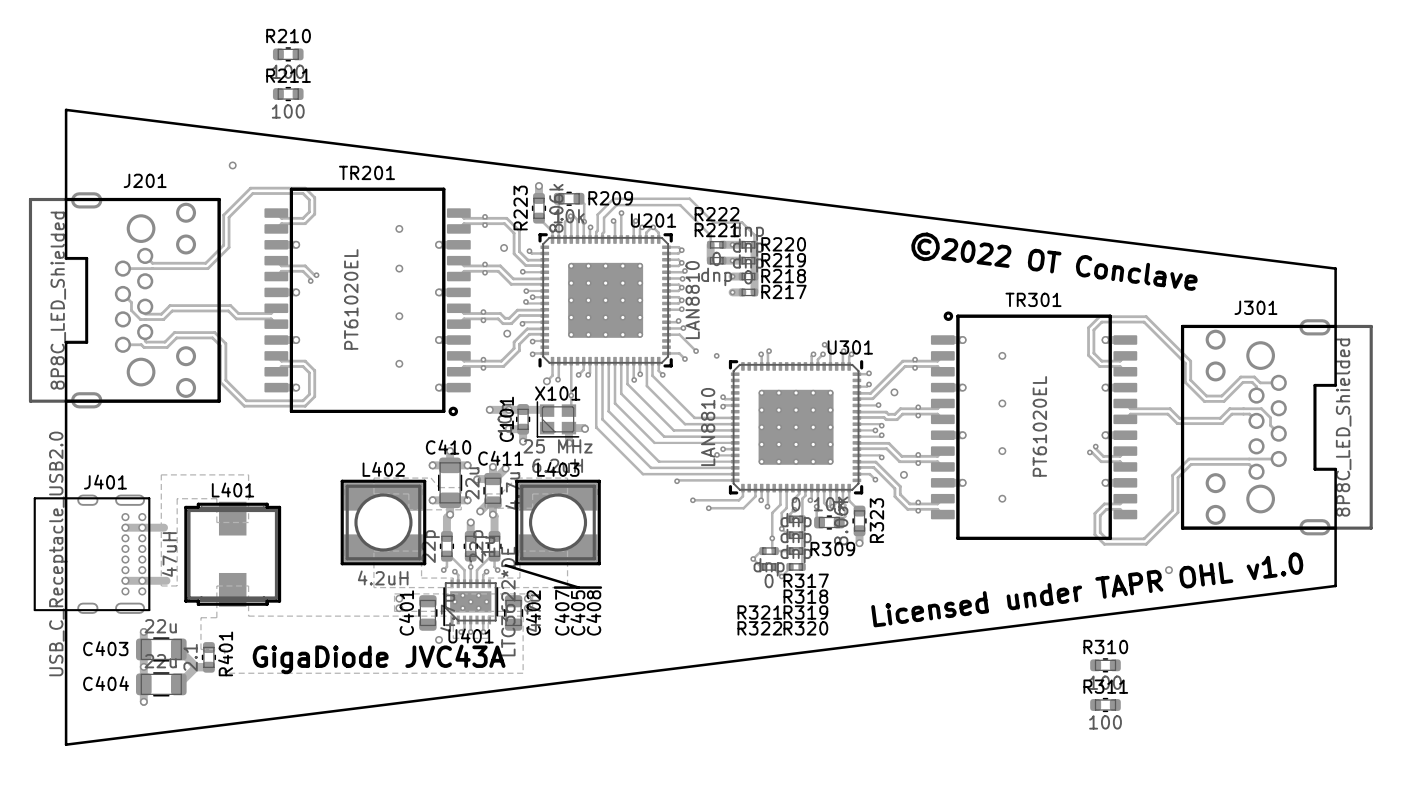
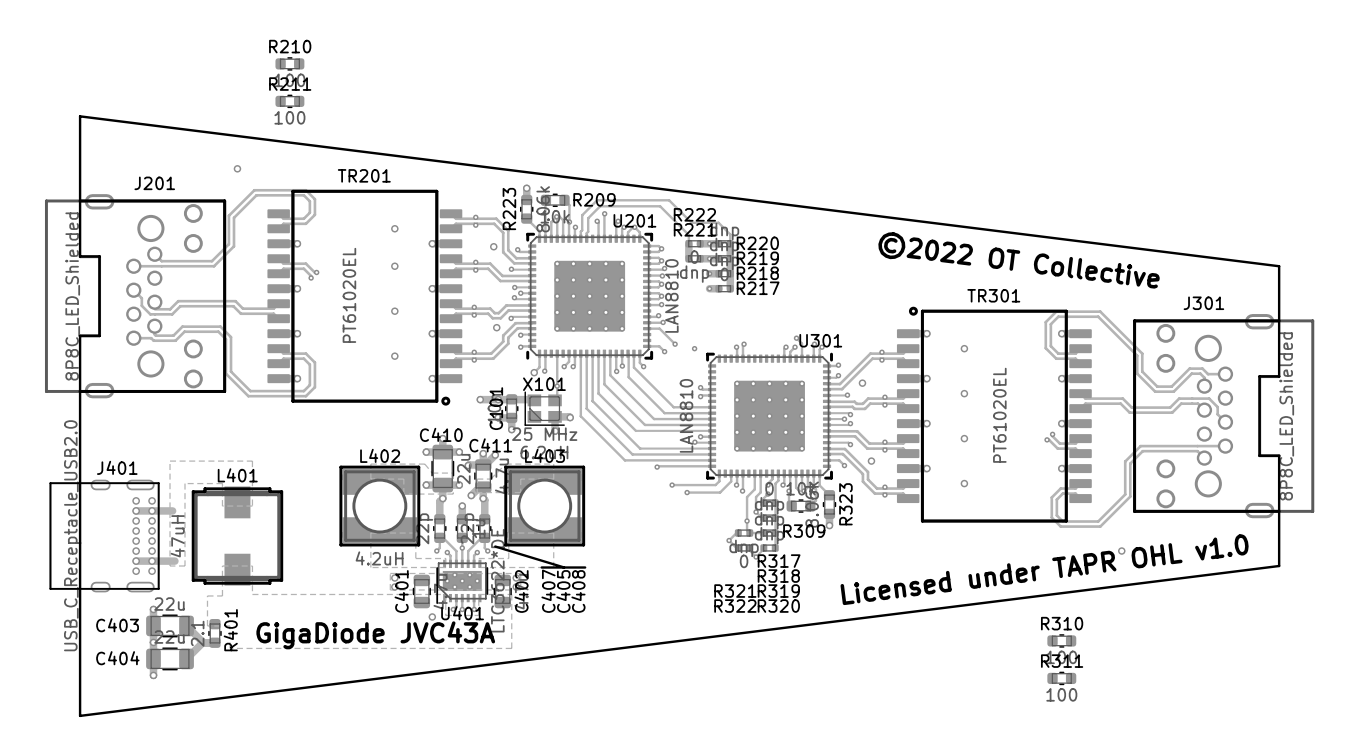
text: ©2022 OT Conclave (1054, 261) -> ©2022 OT Collective (1019, 260)

